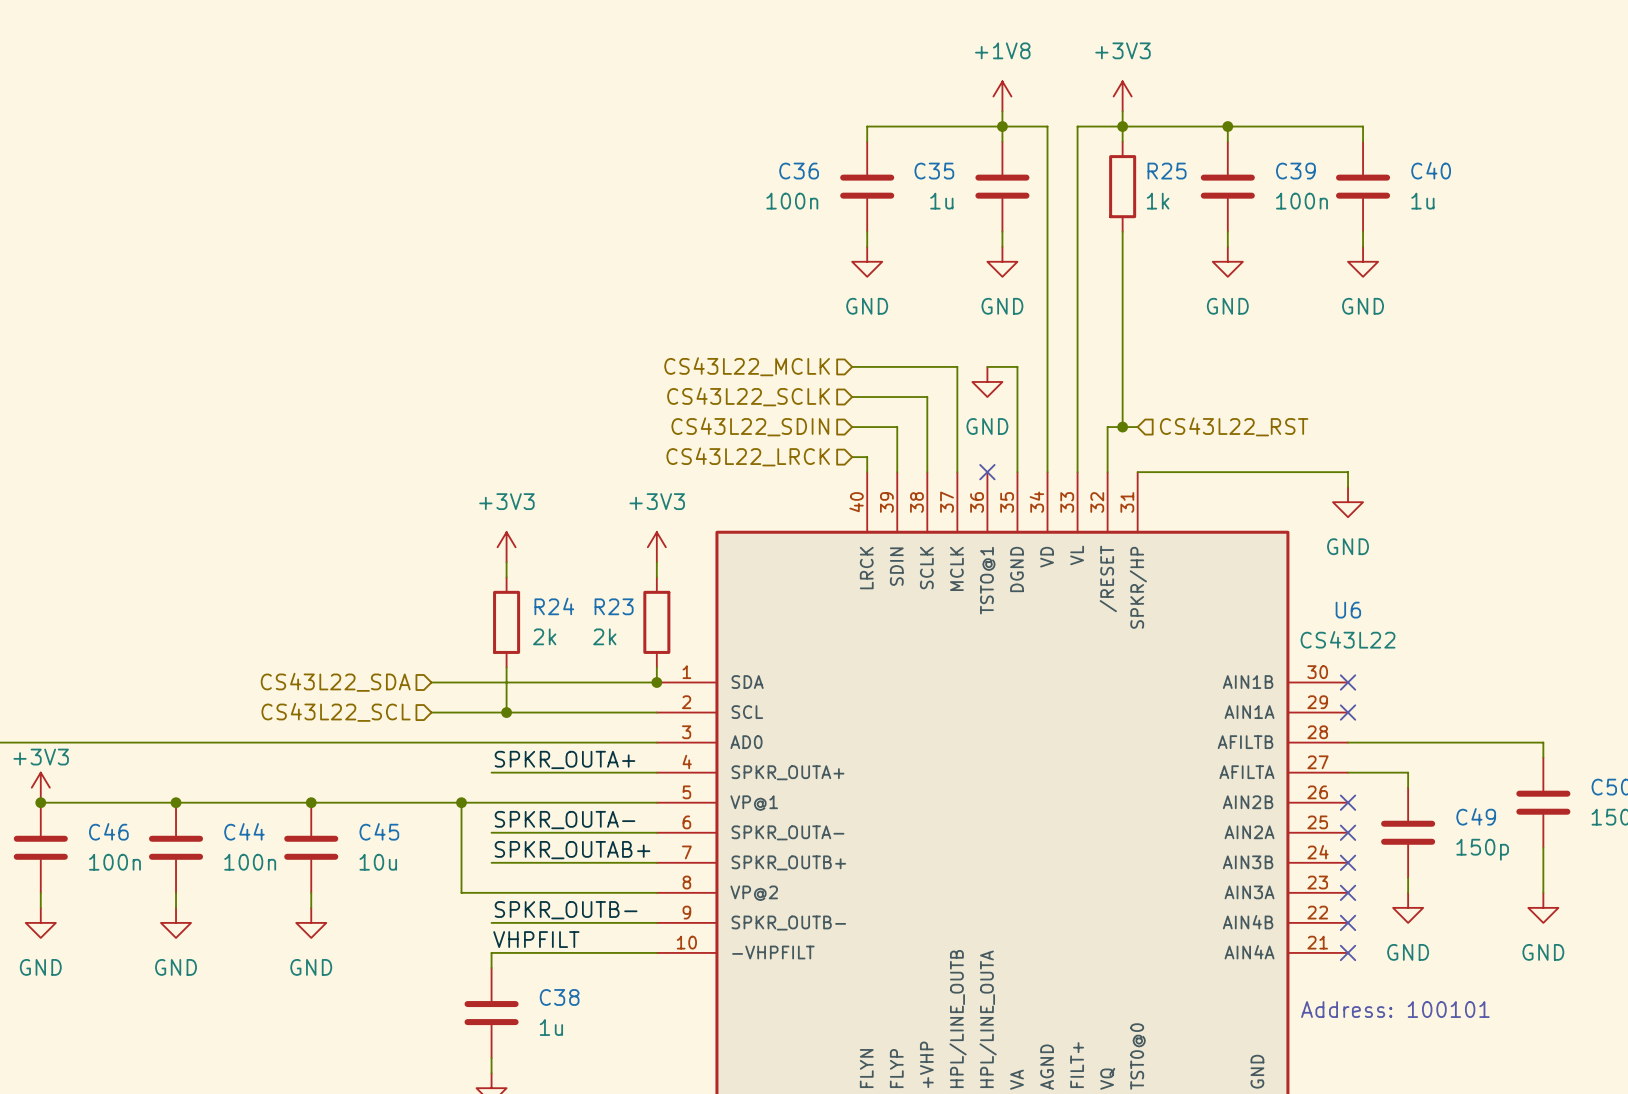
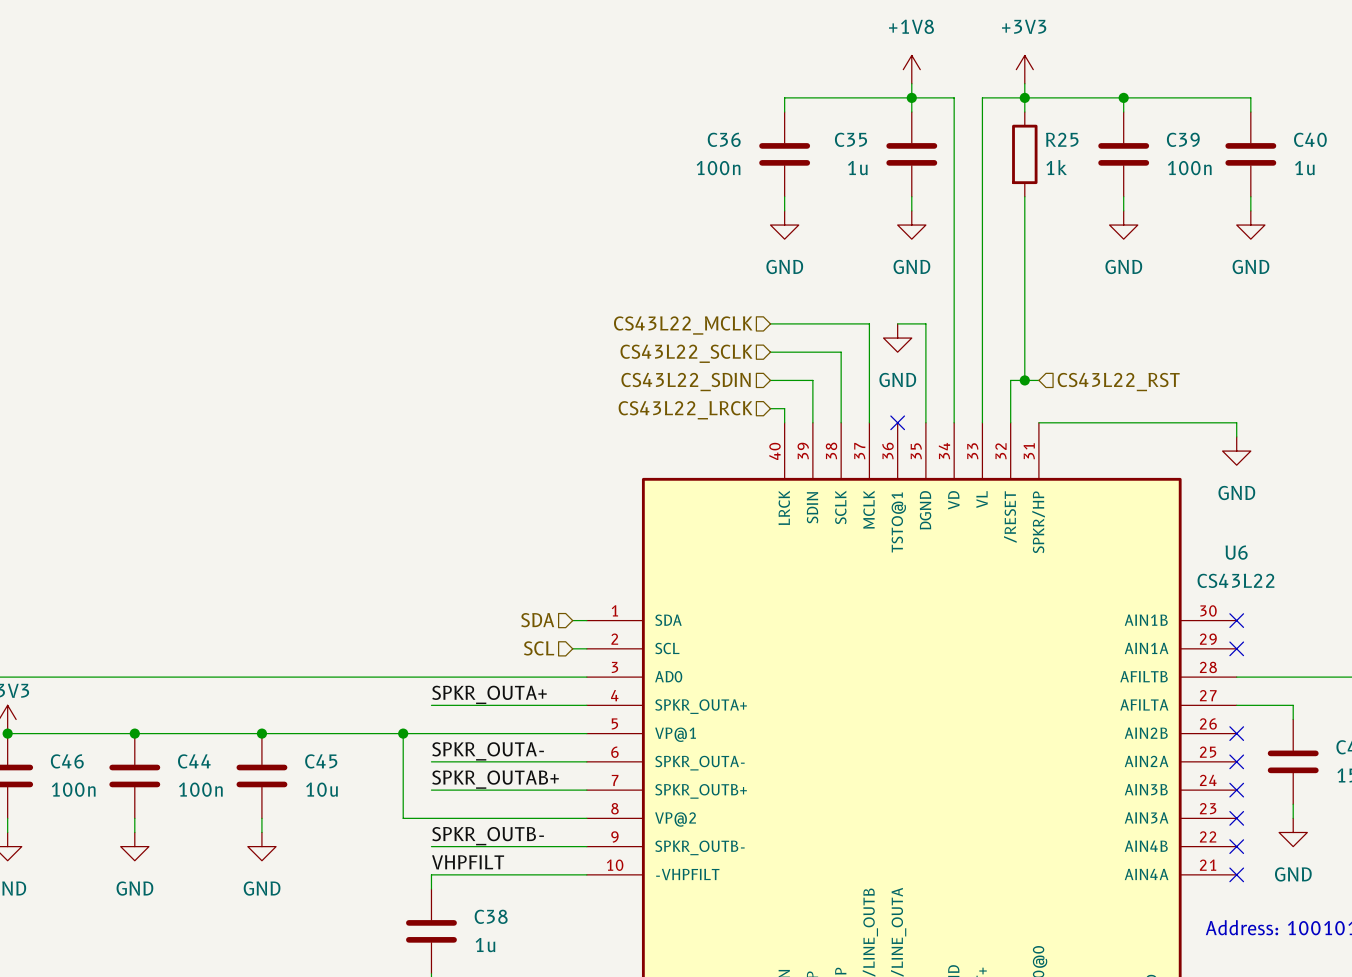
power symbol: +3V3 (506, 547) -> none
power symbol: +3V3 (656, 547) -> none
wire: (506, 562) (506, 577) -> none
wire: (656, 562) (656, 577) -> none
R24: 2k (506, 622) -> none
R23: 2k (656, 622) -> none
wire: (506, 667) (506, 712) -> none
wire: (656, 667) (656, 682) -> none
hierarchical label: none -> SDA (537, 620)
hierarchical label: CS43L22_SDA (335, 682) -> none
wire: (431, 682) (641, 682) -> none
junction: (656, 682) -> none
hierarchical label: none -> SCL (539, 648)
hierarchical label: CS43L22_SCL (336, 712) -> none
wire: (431, 712) (641, 712) -> none
junction: (506, 712) -> none

